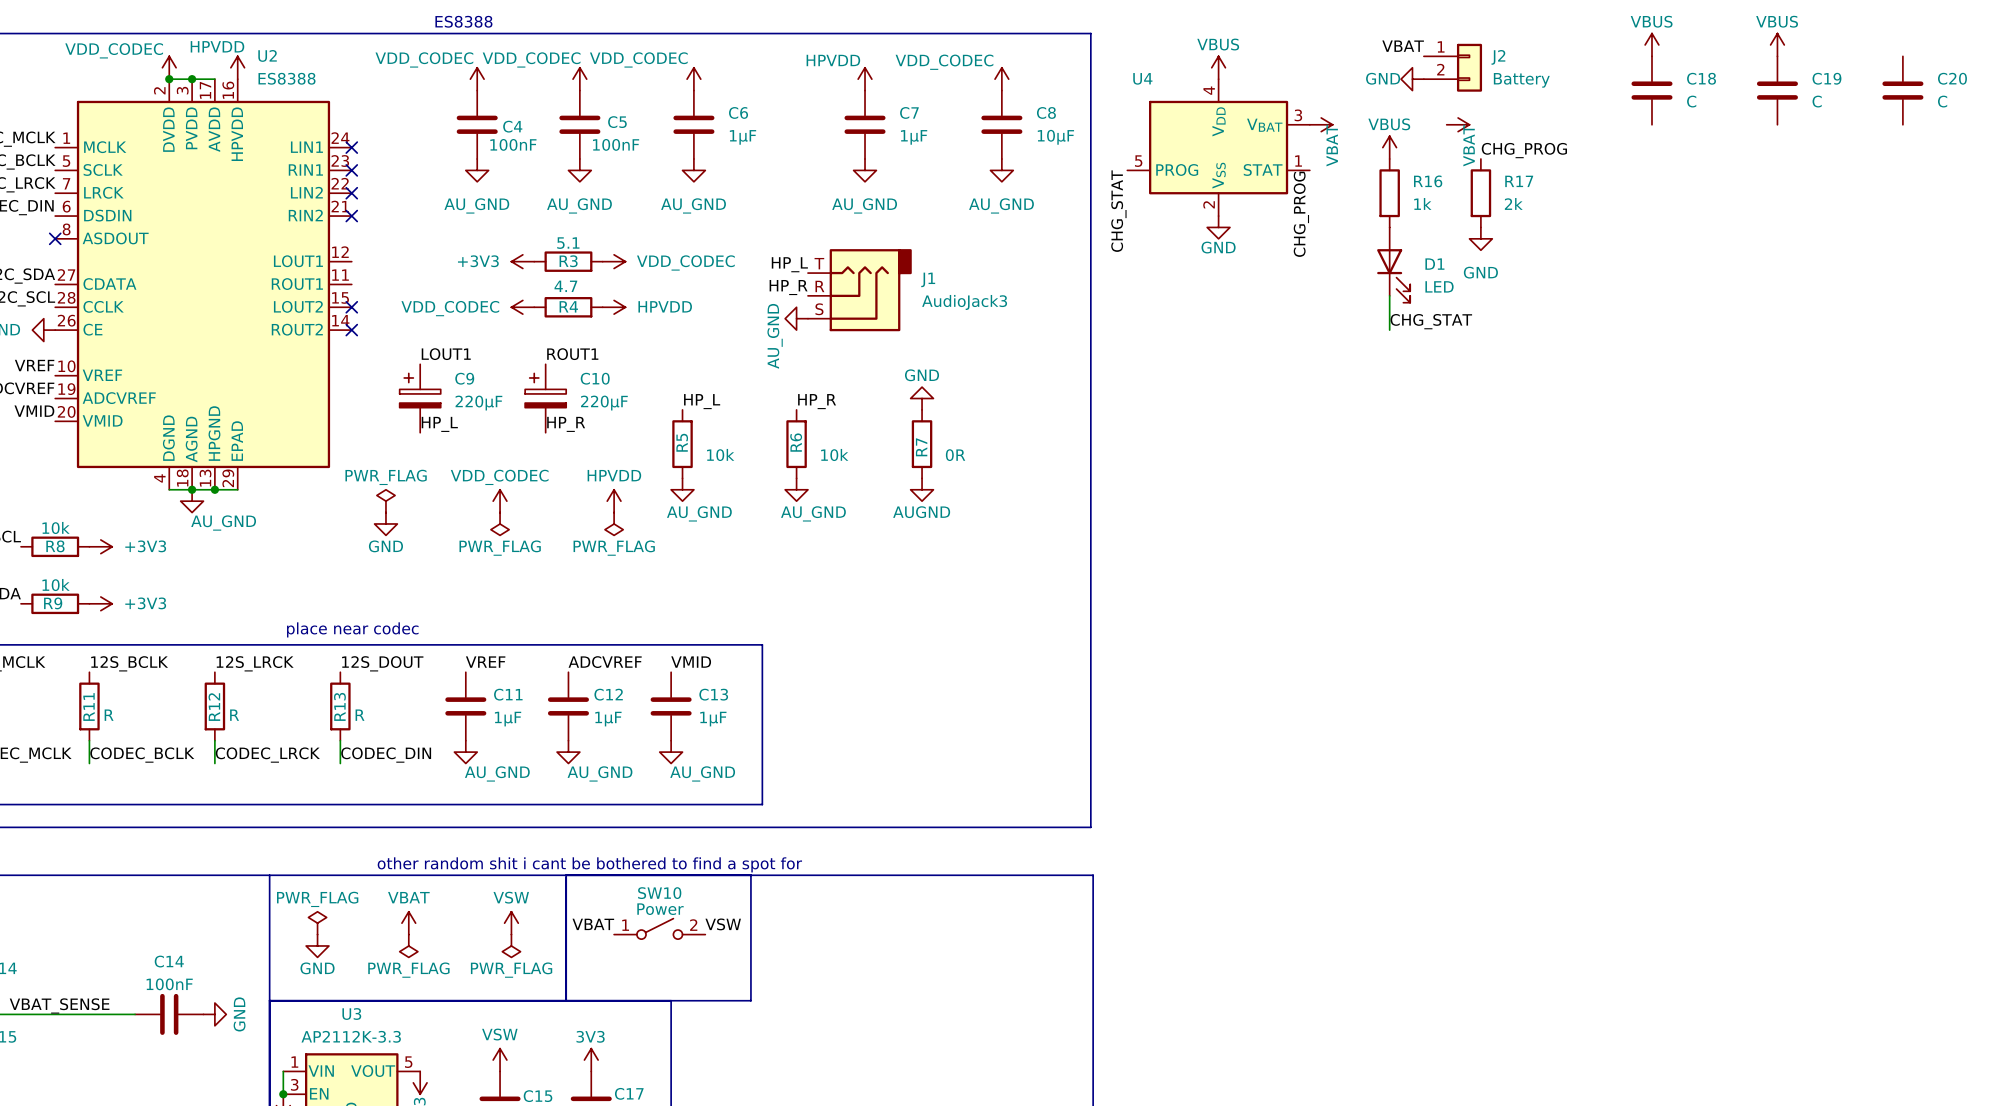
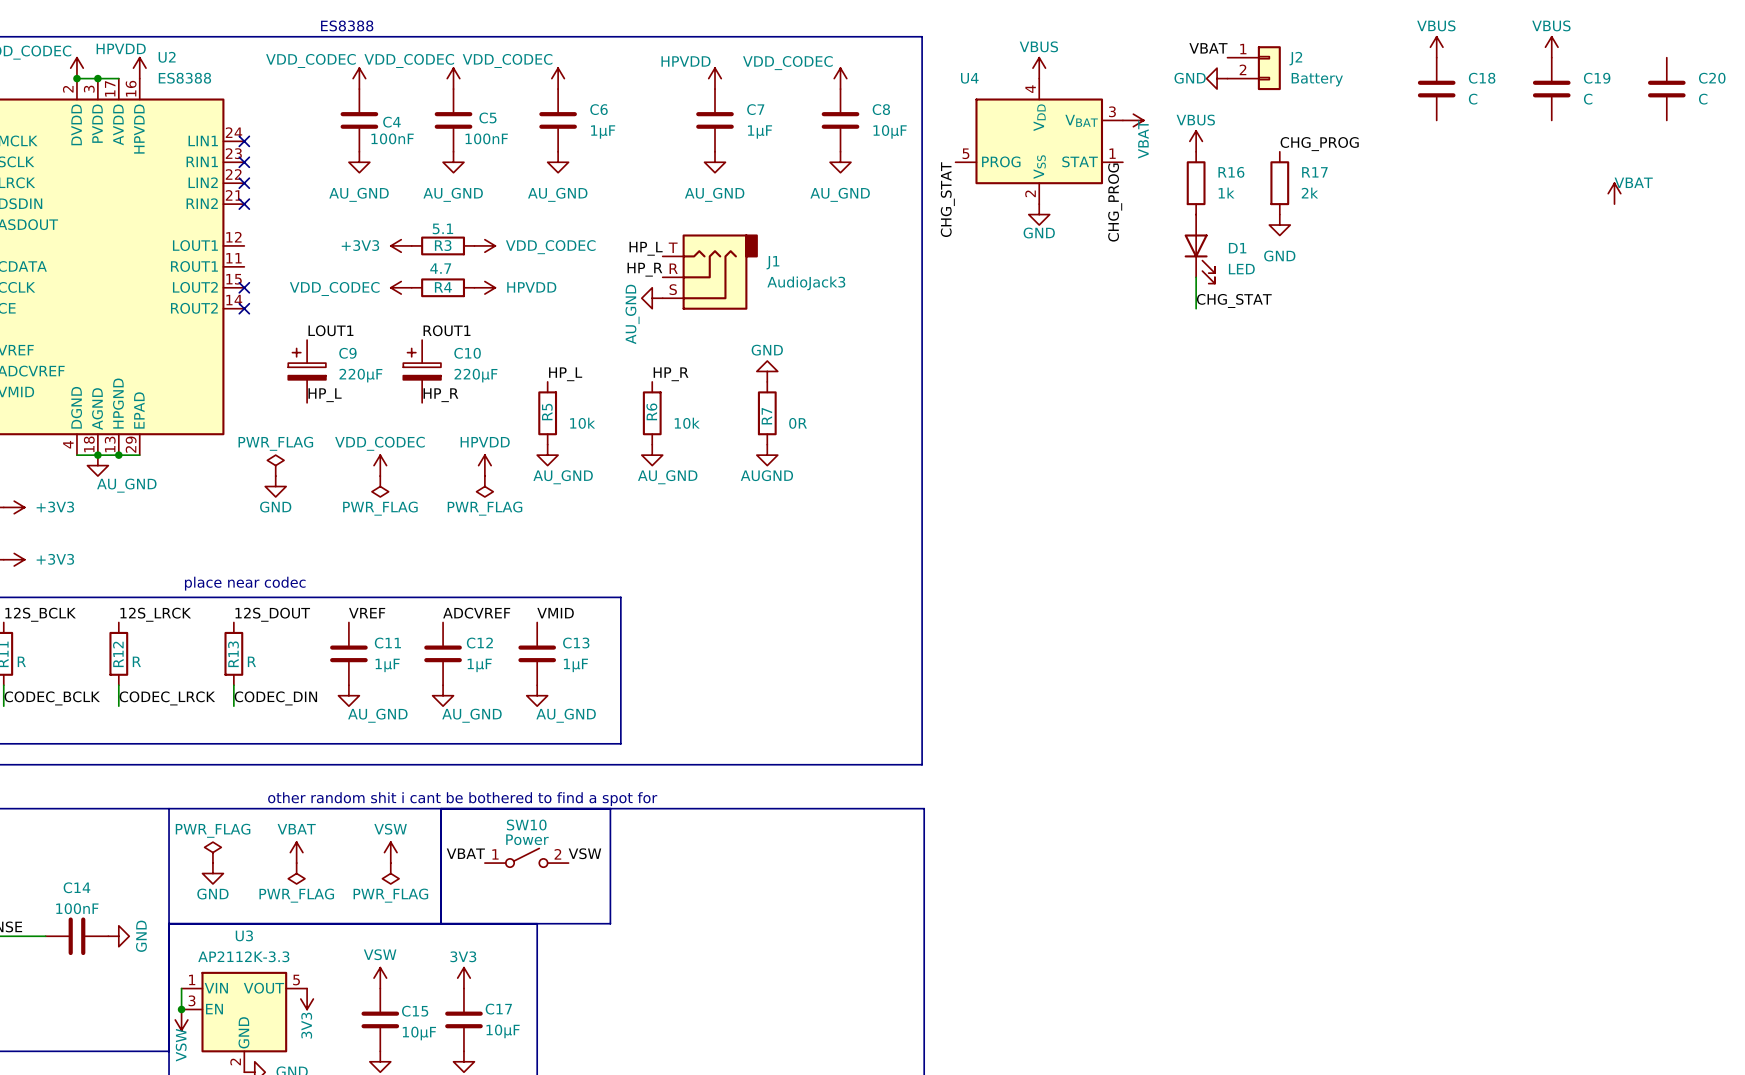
power symbol: VBAT (1458, 124) -> none
power symbol: none -> VBAT (1614, 193)

